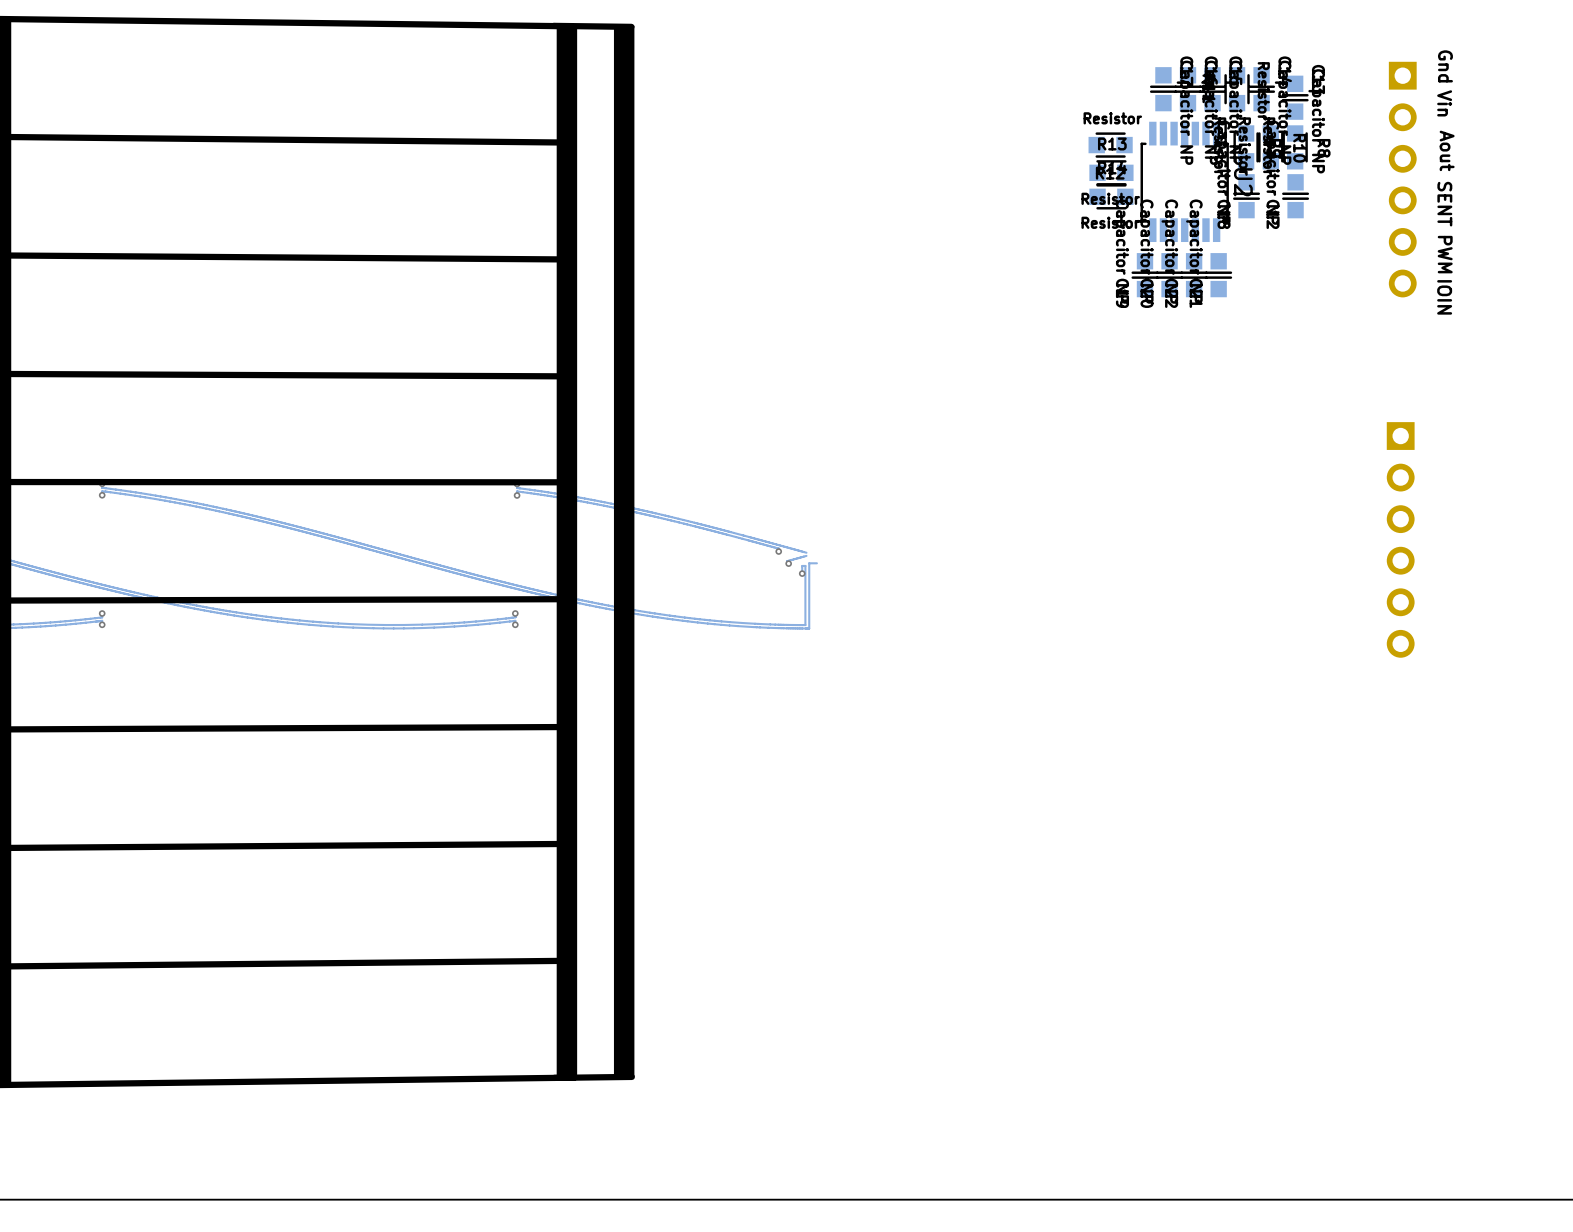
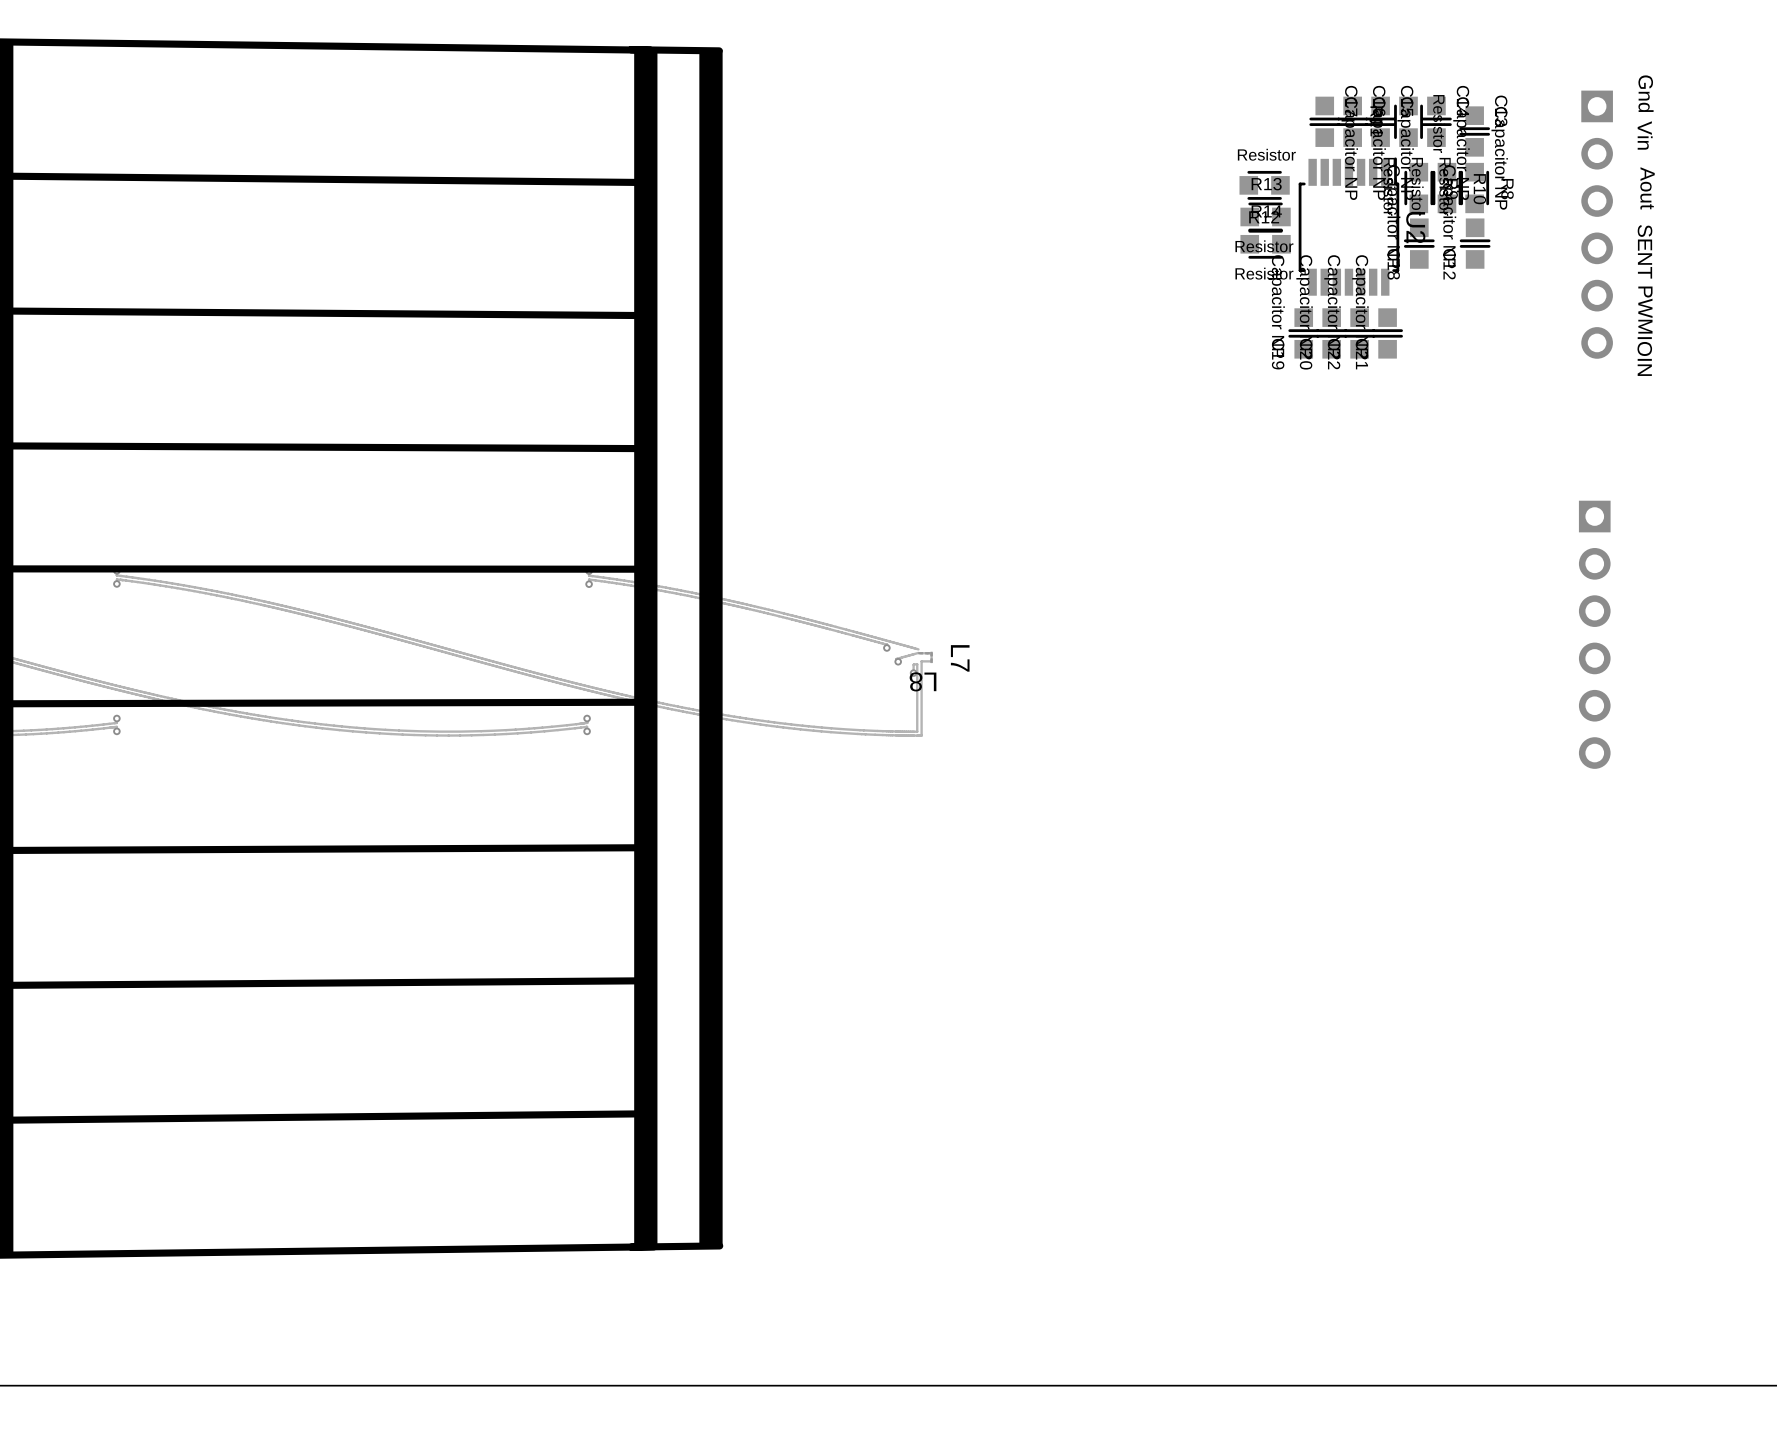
L8: none -> (924, 653)
L7: none -> (931, 657)

